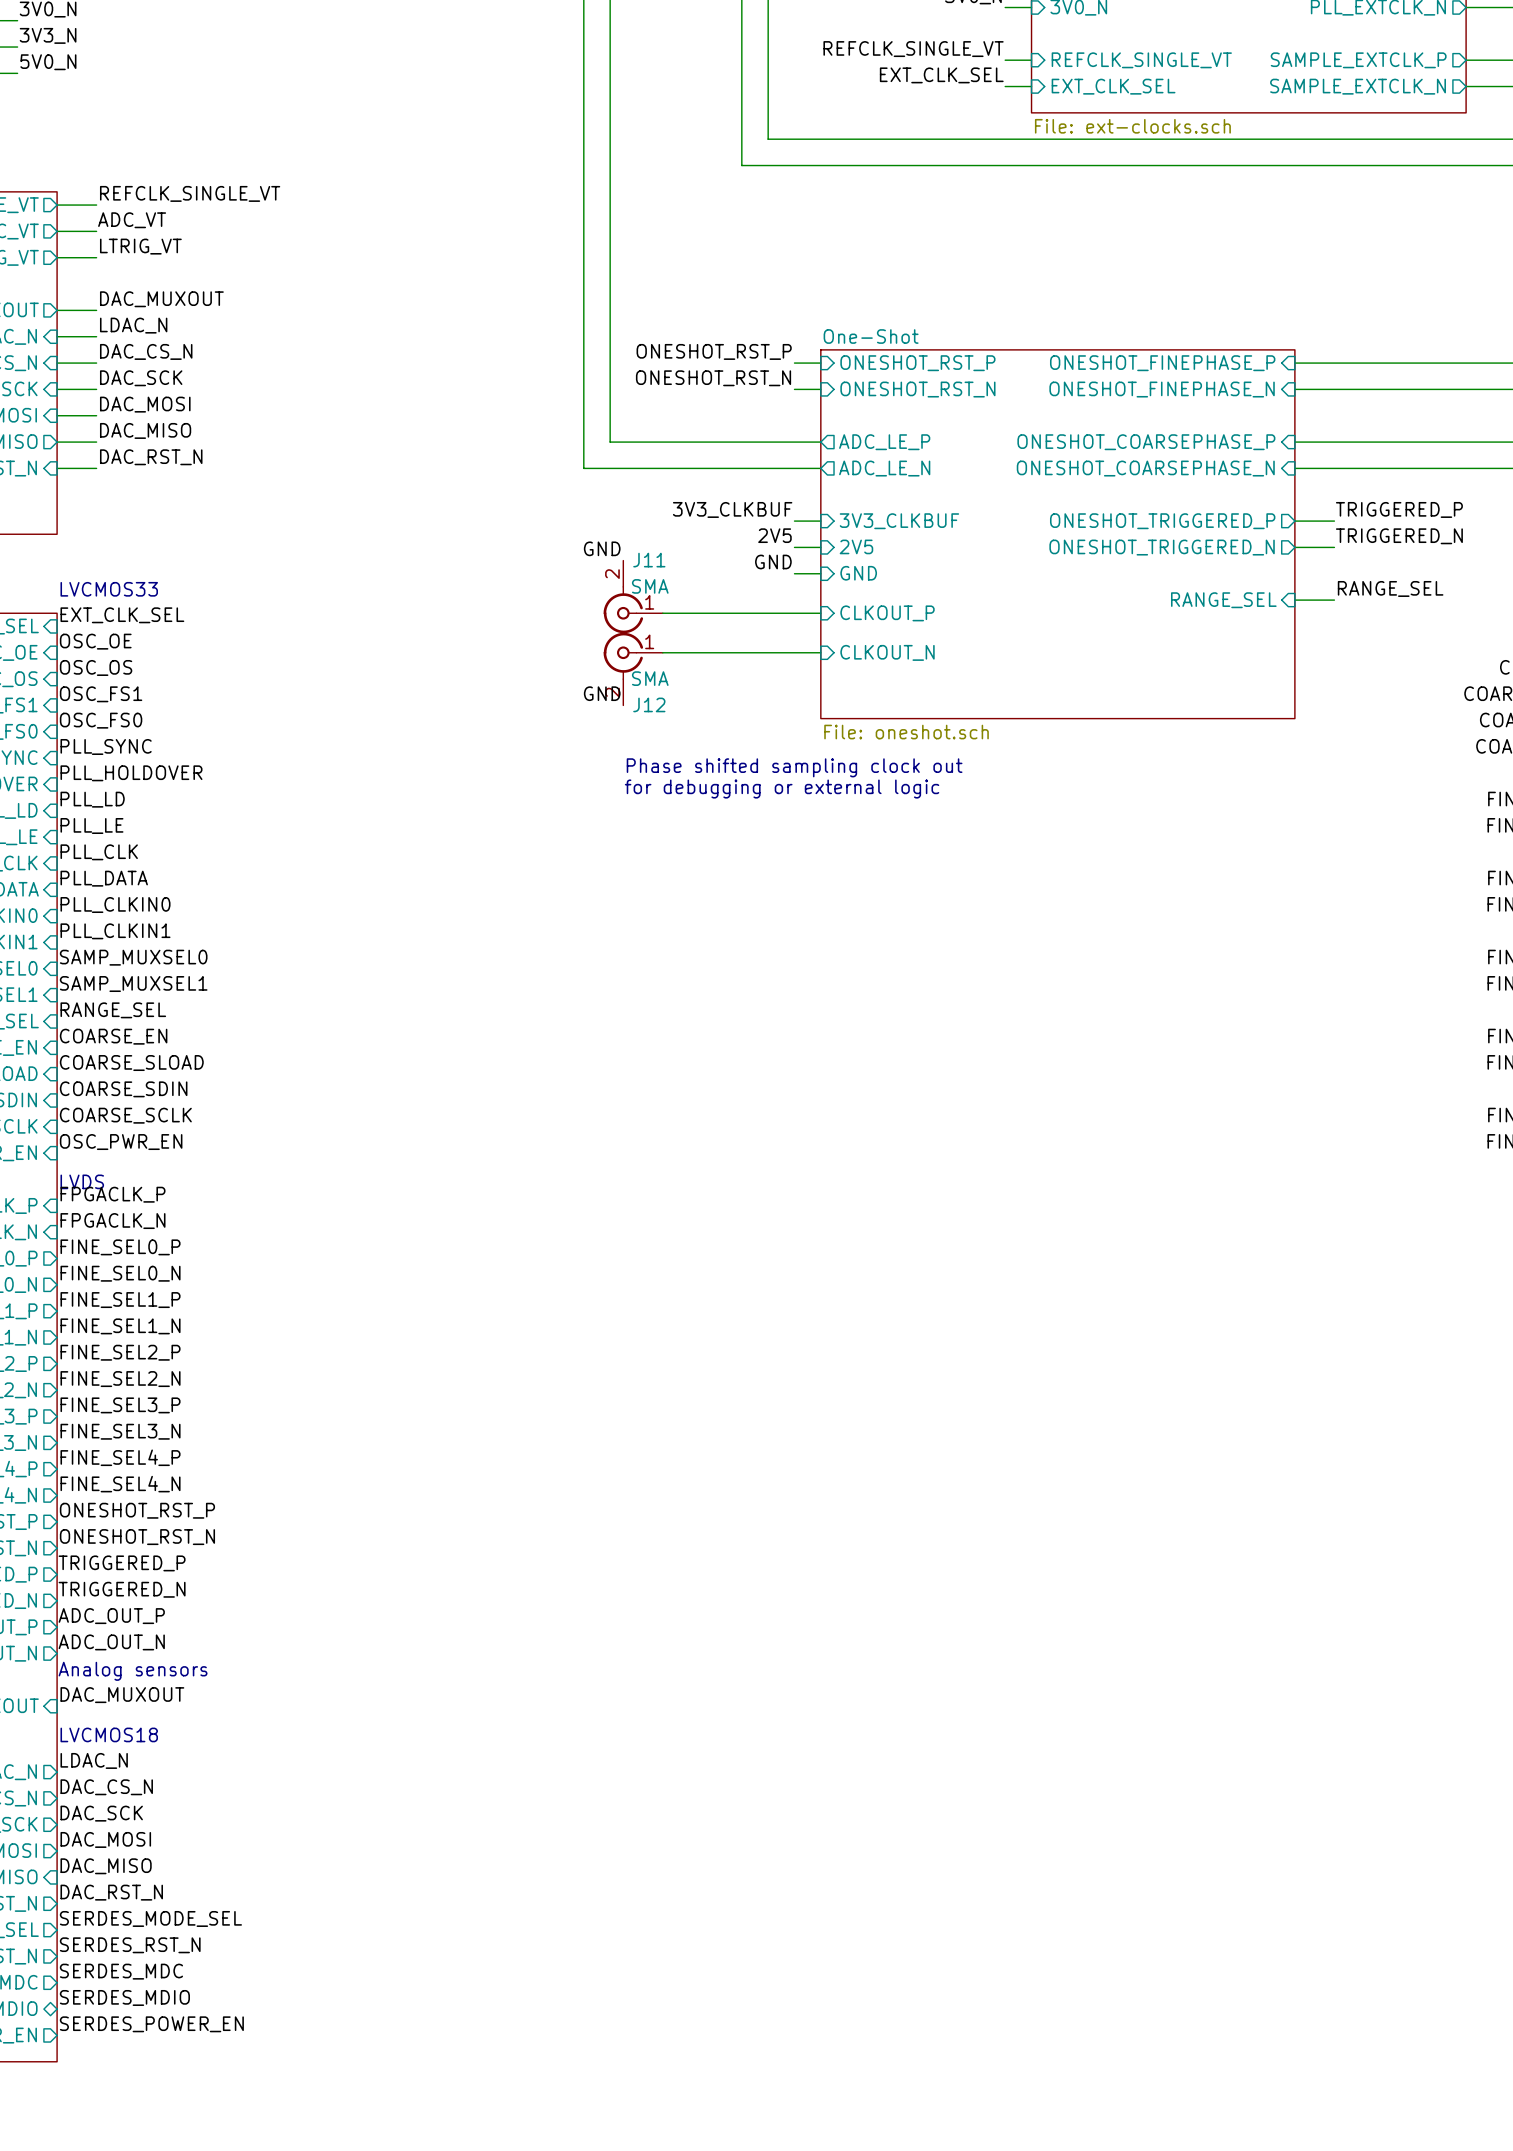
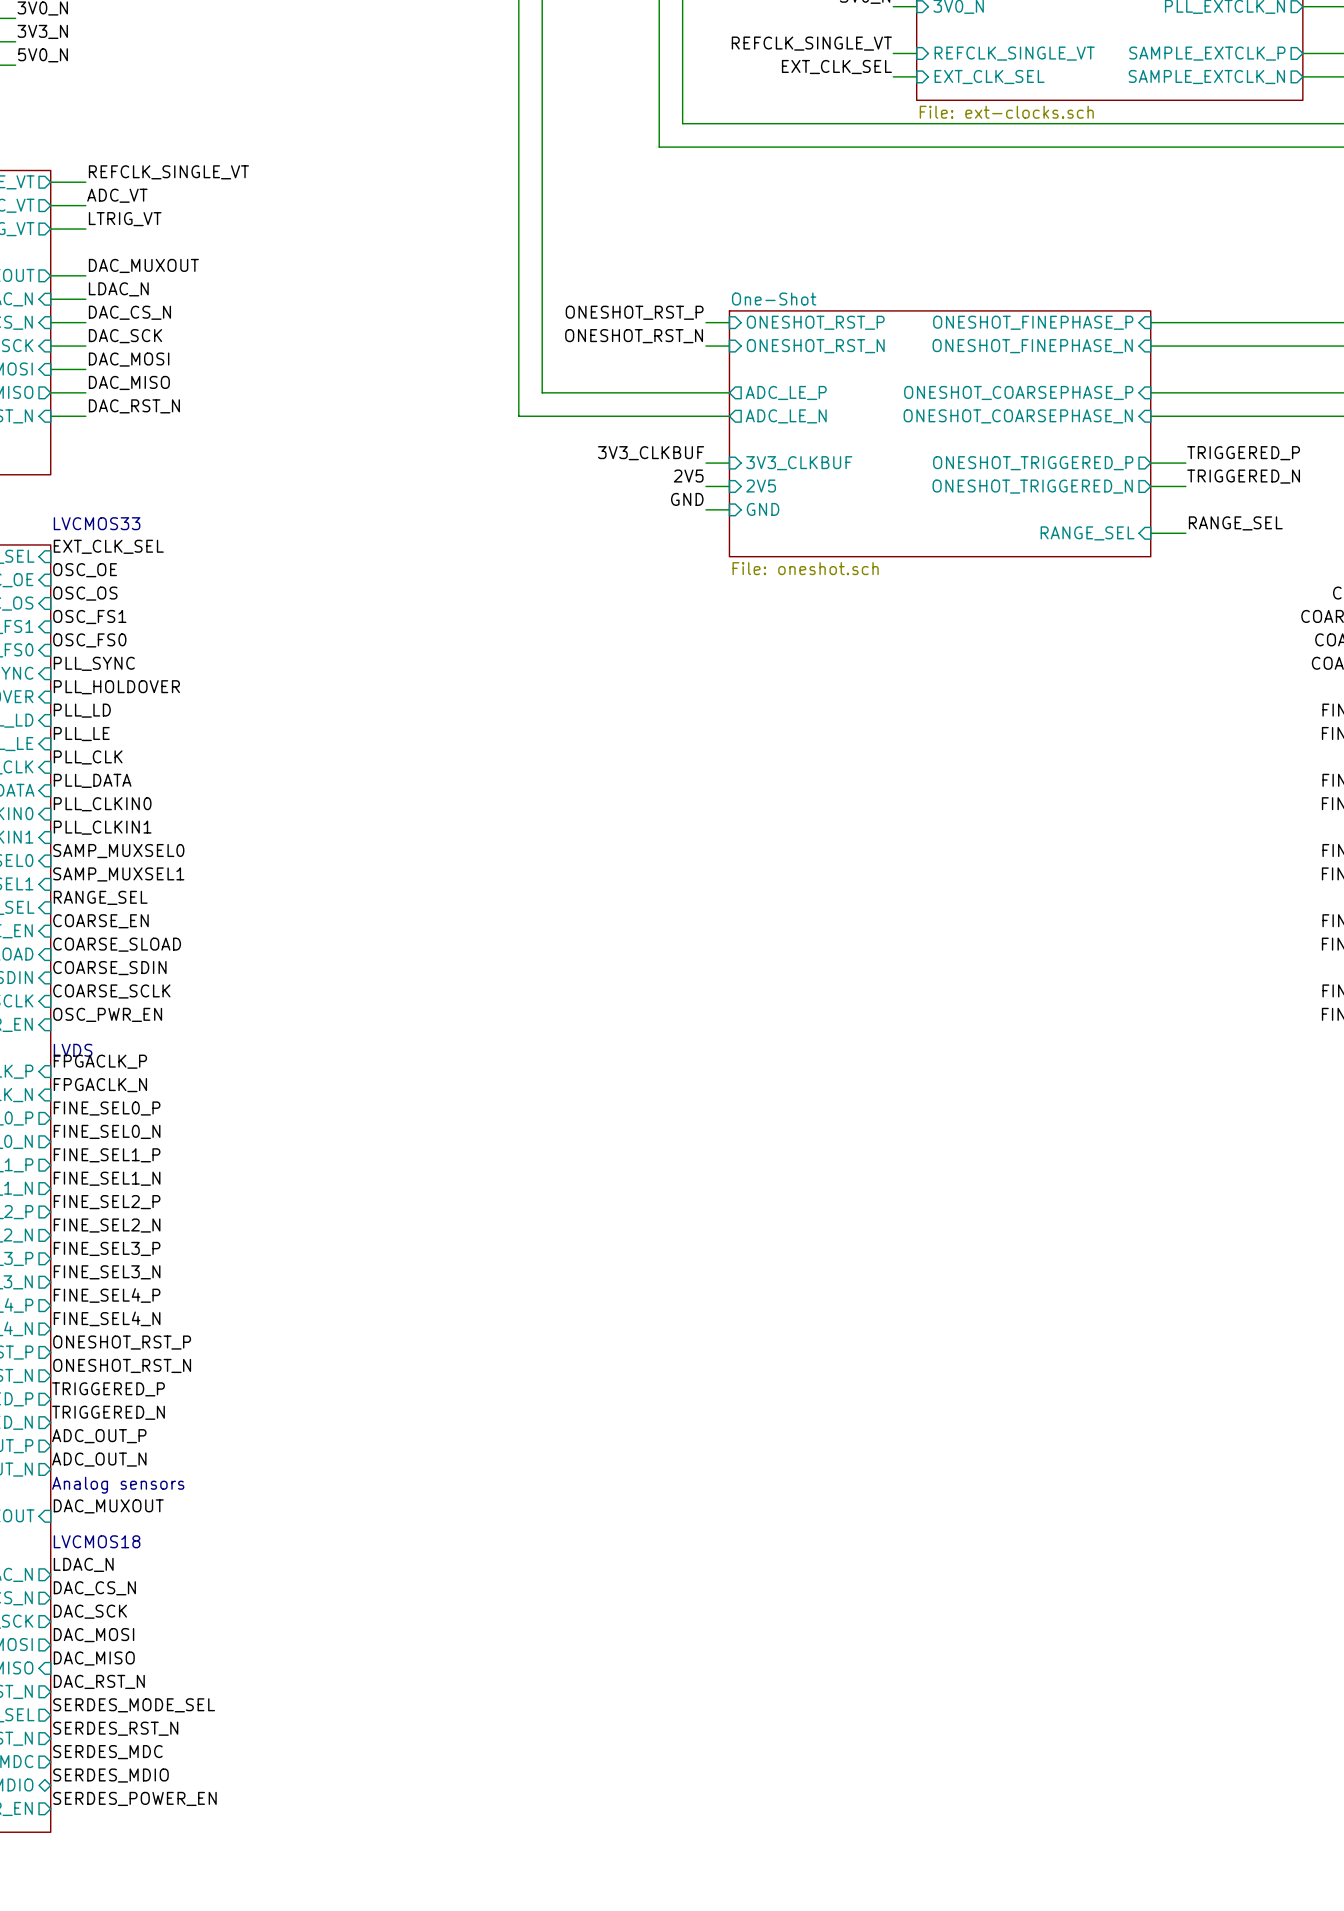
sheet One-Shot: none -> File: oneshot.sch (940, 433)
sheet One-Shot: File: oneshot.sch (1057, 534) -> none
label: GND (602, 548) -> none
J11: SMA (633, 596) -> none
wire: (662, 613) (820, 613) -> none
sheet pin: CLKOUT_P (887, 613) -> none
wire: (662, 652) (820, 652) -> none
sheet pin: CLKOUT_N (887, 652) -> none
J12: SMA (633, 669) -> none
label: GND (602, 693) -> none
text: Phase shifted sampling clock out (794, 767) -> none
text: for debugging or external logic (782, 789) -> none

